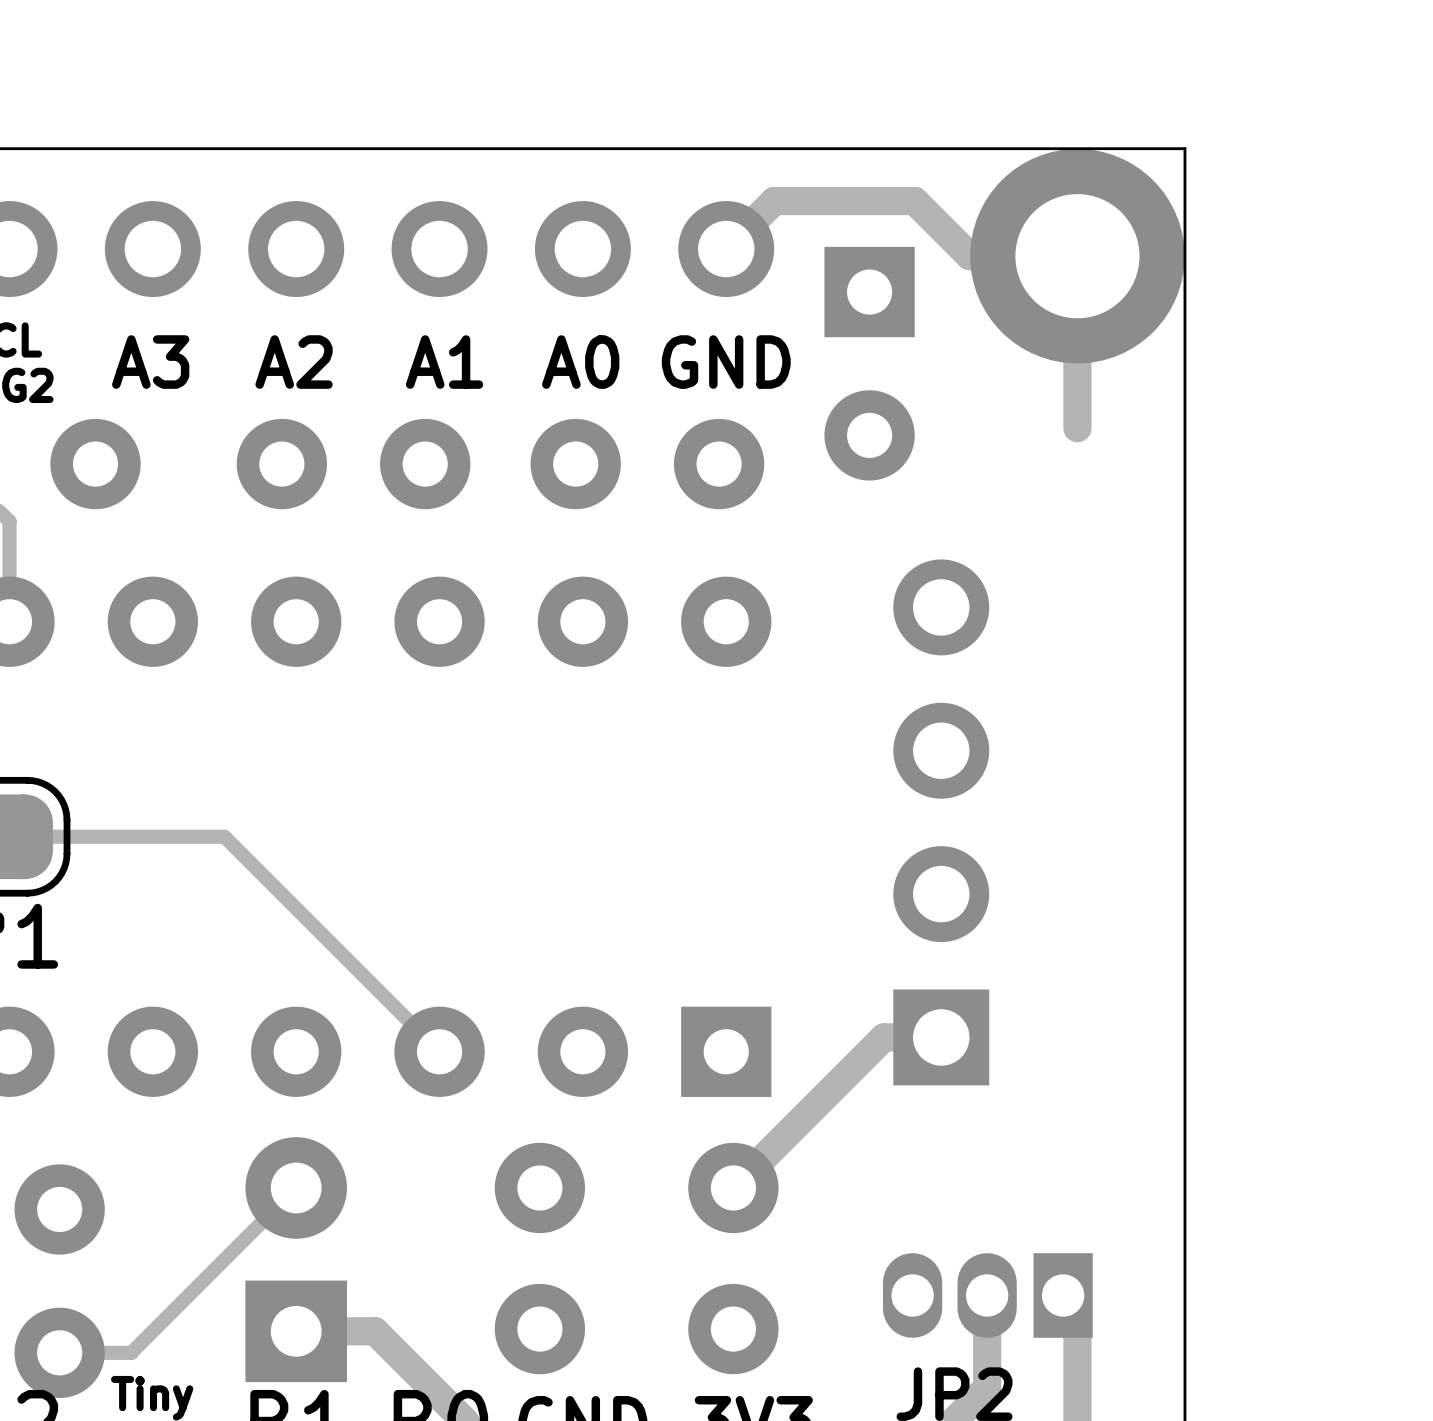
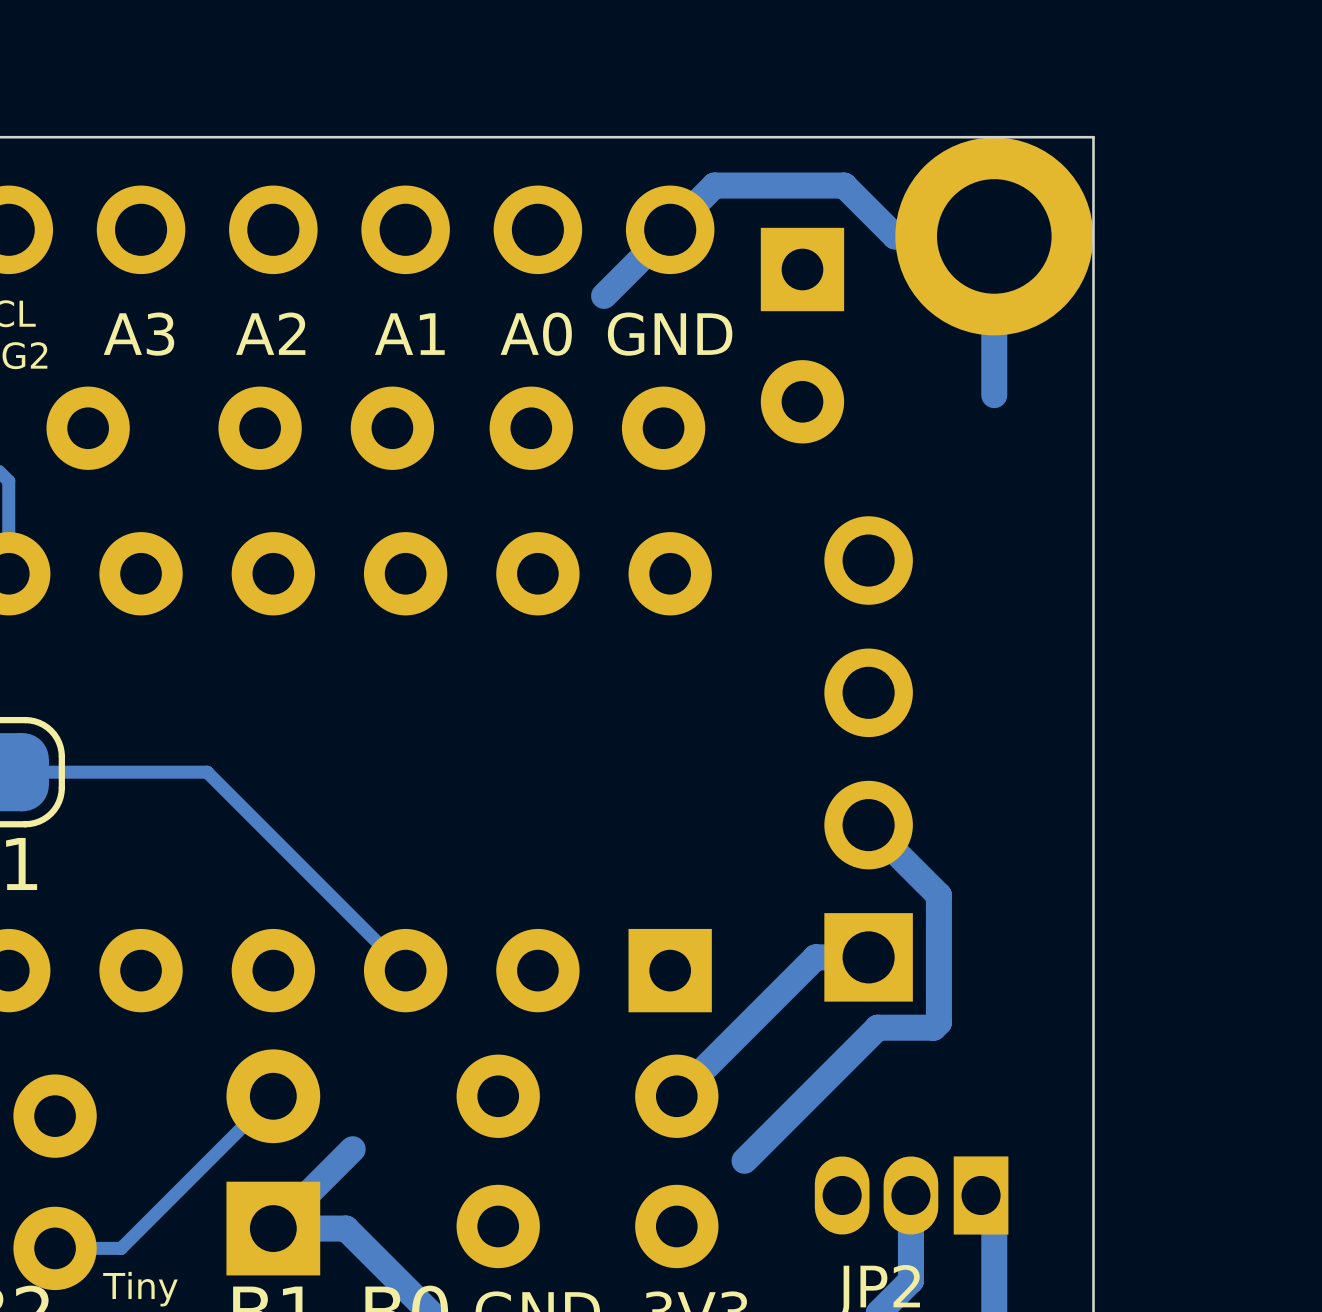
track: none -> (670, 229) (604, 295)
track: none -> (868, 825) (938, 895) (938, 1022) (933, 1027) (877, 1027) (744, 1160)
track: none -> (352, 1149) (273, 1228)

